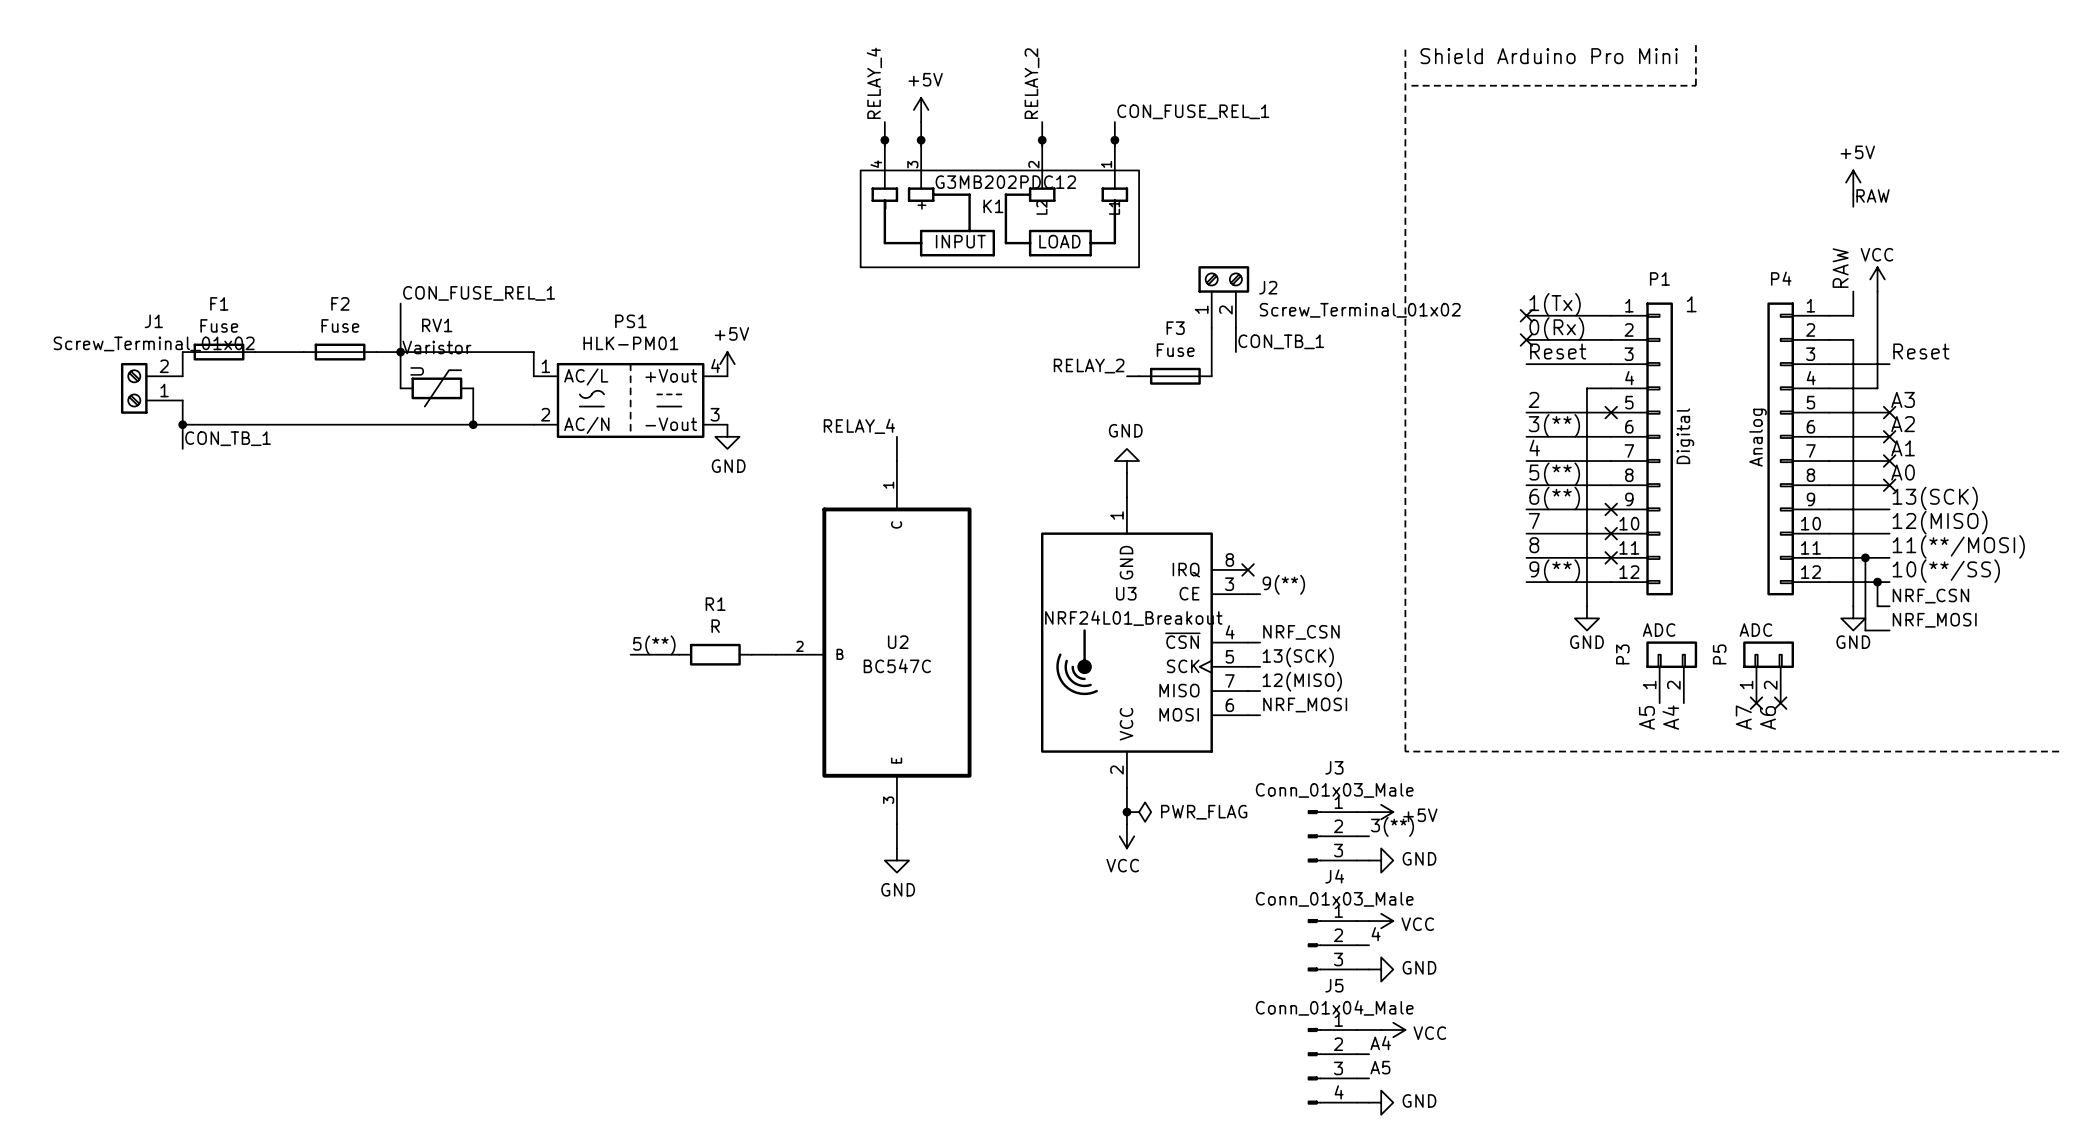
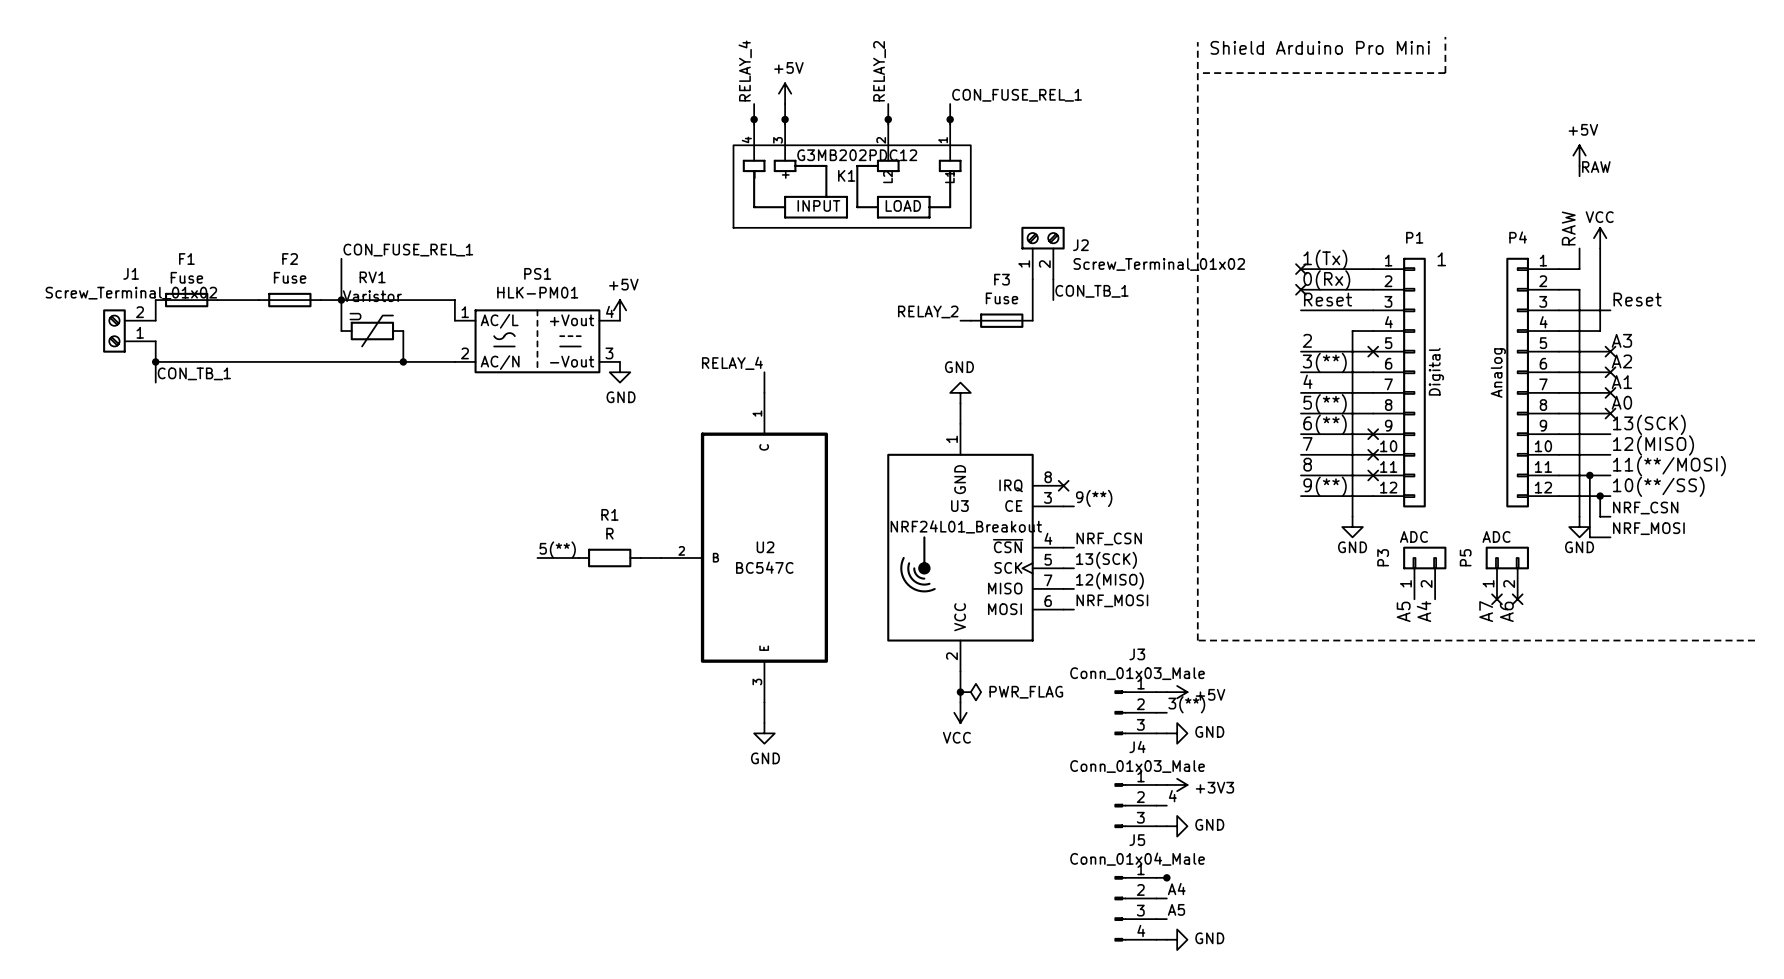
power symbol: VCC (1381, 921) -> +3V3 (1177, 784)
wire: (1369, 1029) (1381, 1029) -> none
junction: none -> (1166, 877)
power symbol: VCC (1393, 1029) -> none

